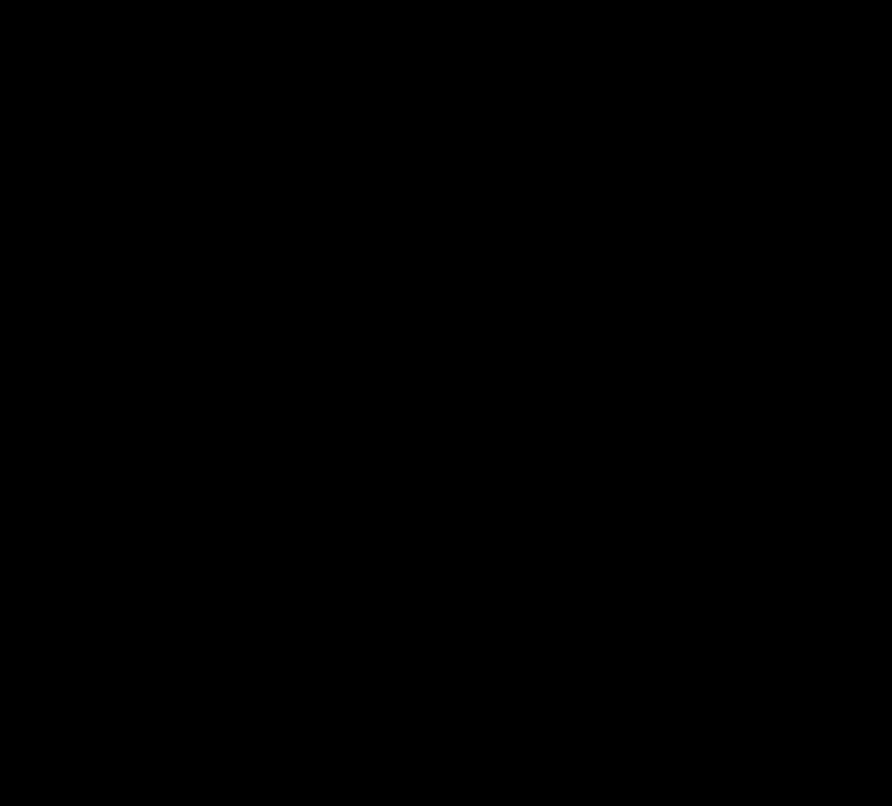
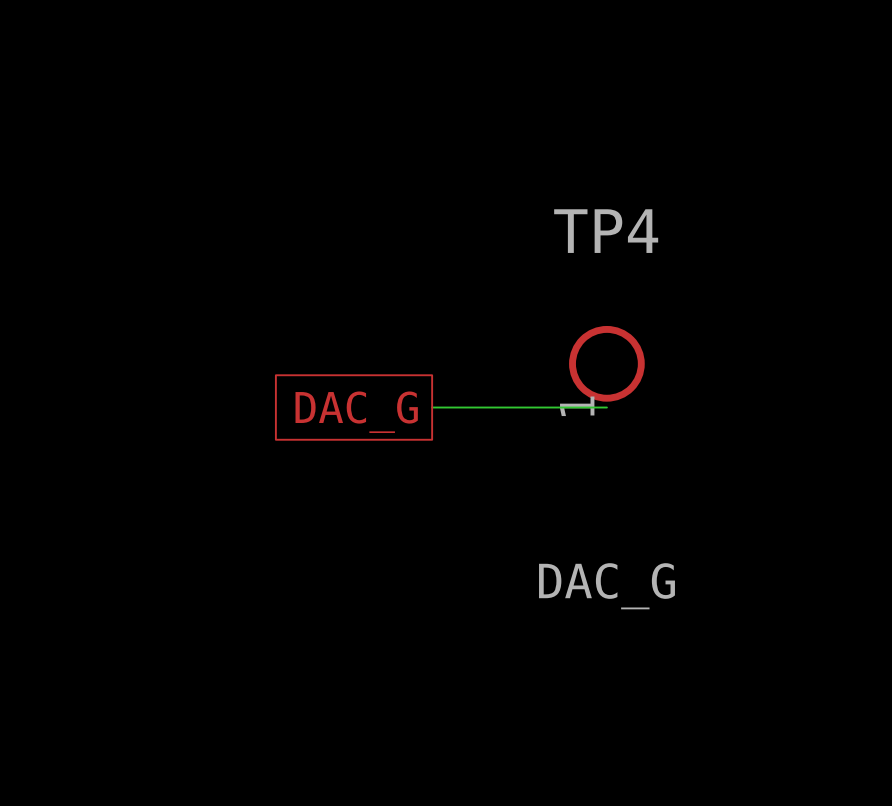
TP4: none -> DAC_G (606, 363)
wire: none -> (432, 407) (606, 407)
global label: none -> DAC_G (356, 412)

